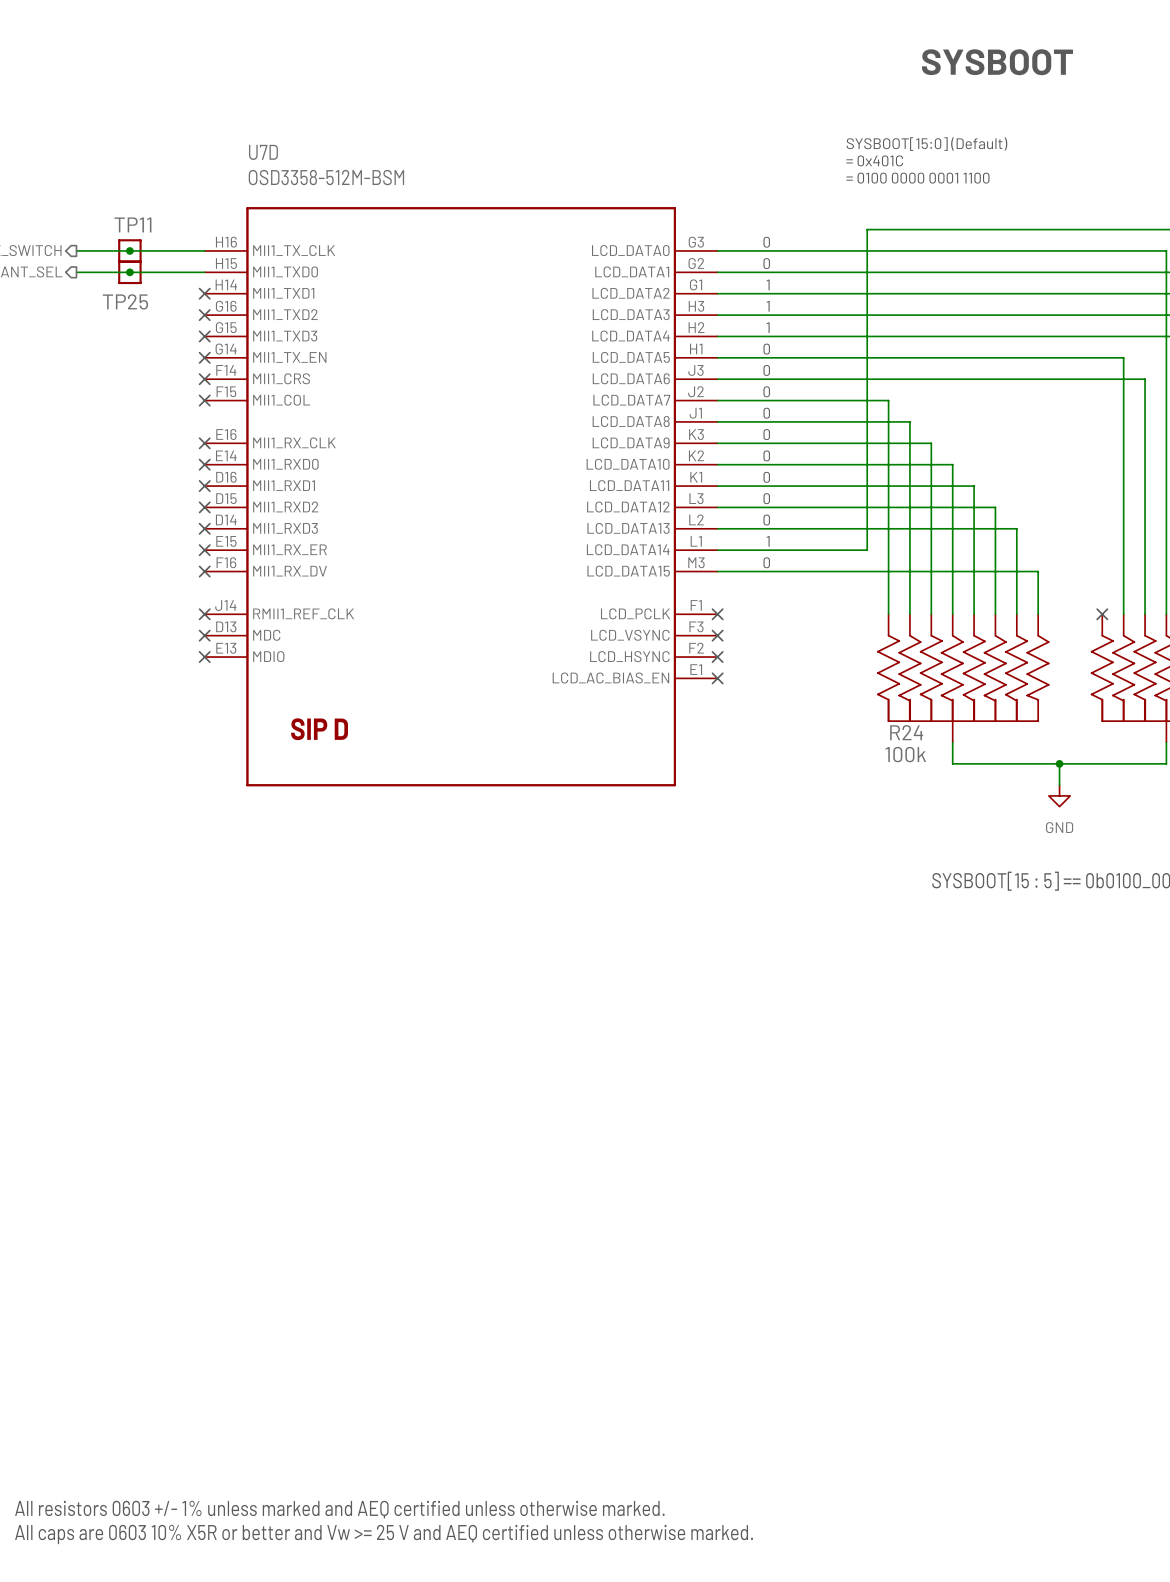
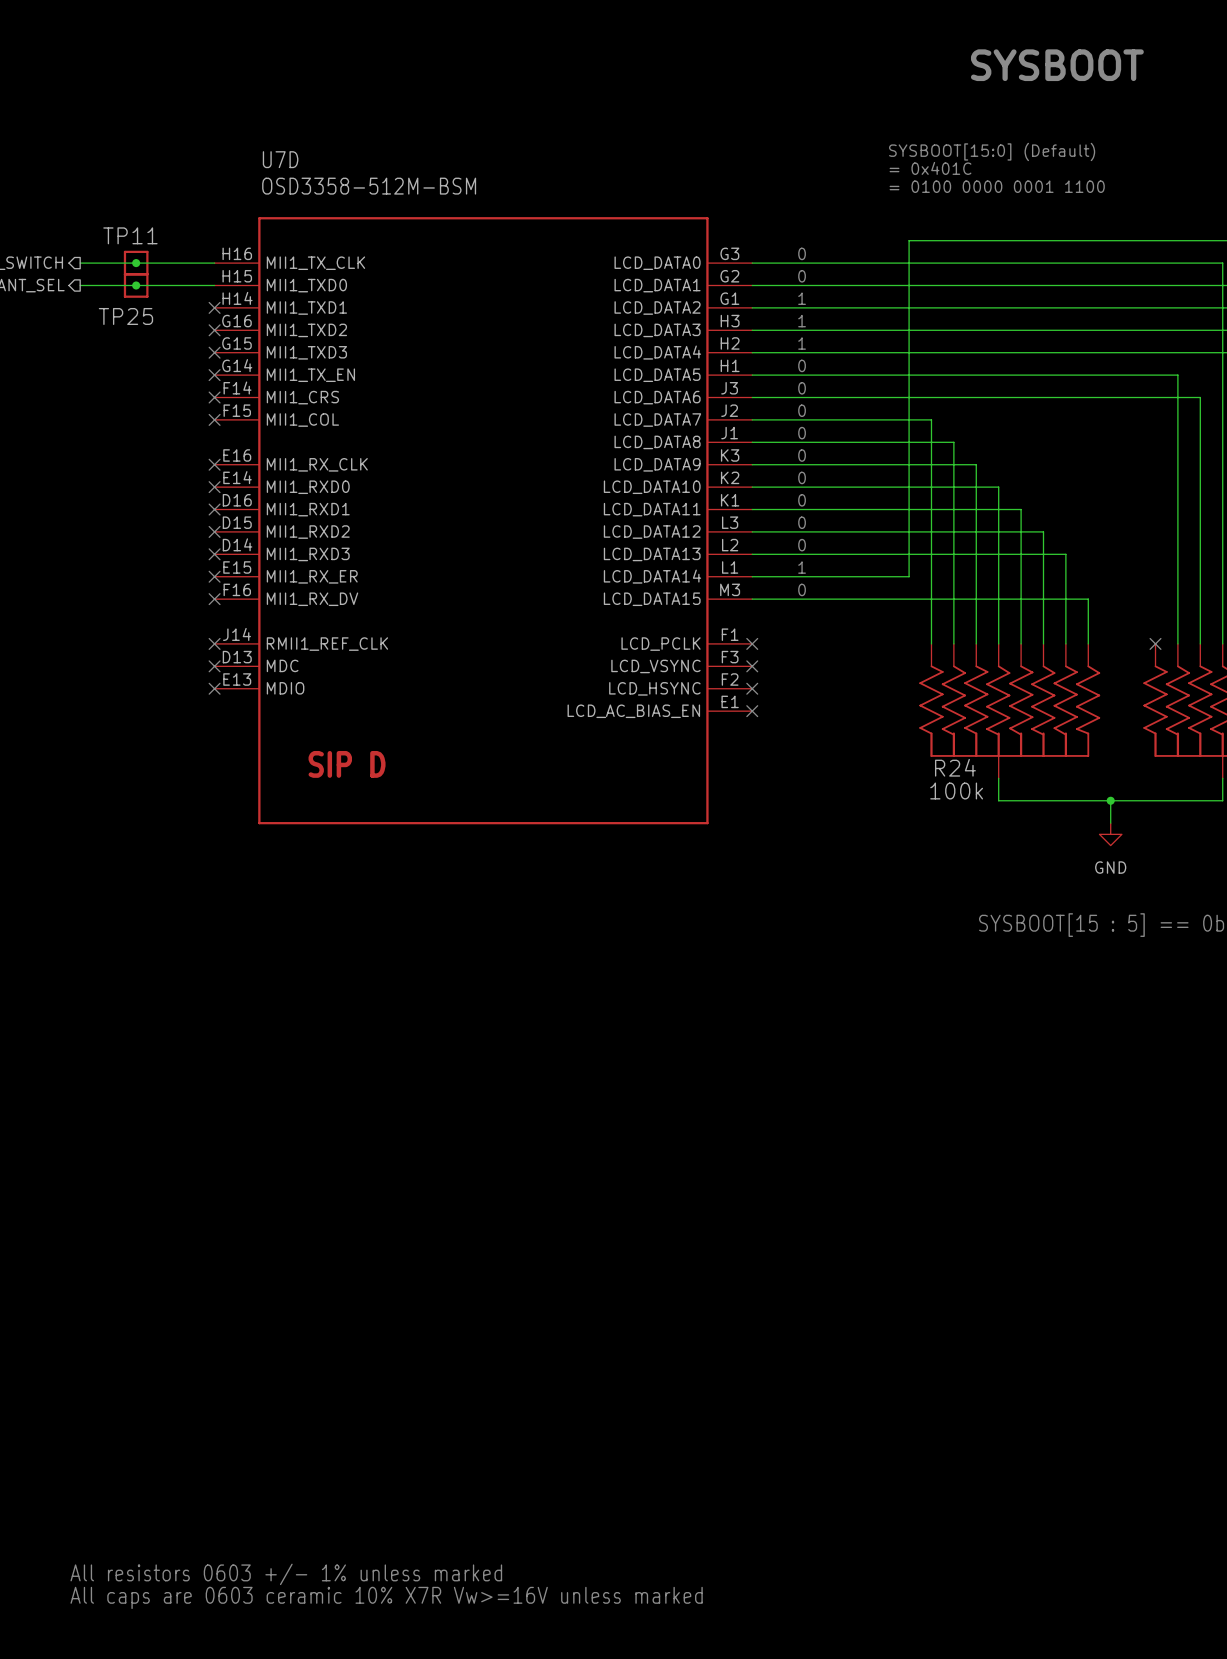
text: All resistors 0603 +/- 1% unless marked and AEQ certified unless otherwise marked. (339, 1509) -> All resistors 0603 +/- 1% unless marked (286, 1574)
text: none -> All caps are 0603 ceramic 10% X7R Vw>=16V unless marked (386, 1597)
text: All caps are 0603 10% X5R or better and Vw >= 25 V and AEQ certified unless otherwise marked. (384, 1534) -> none

